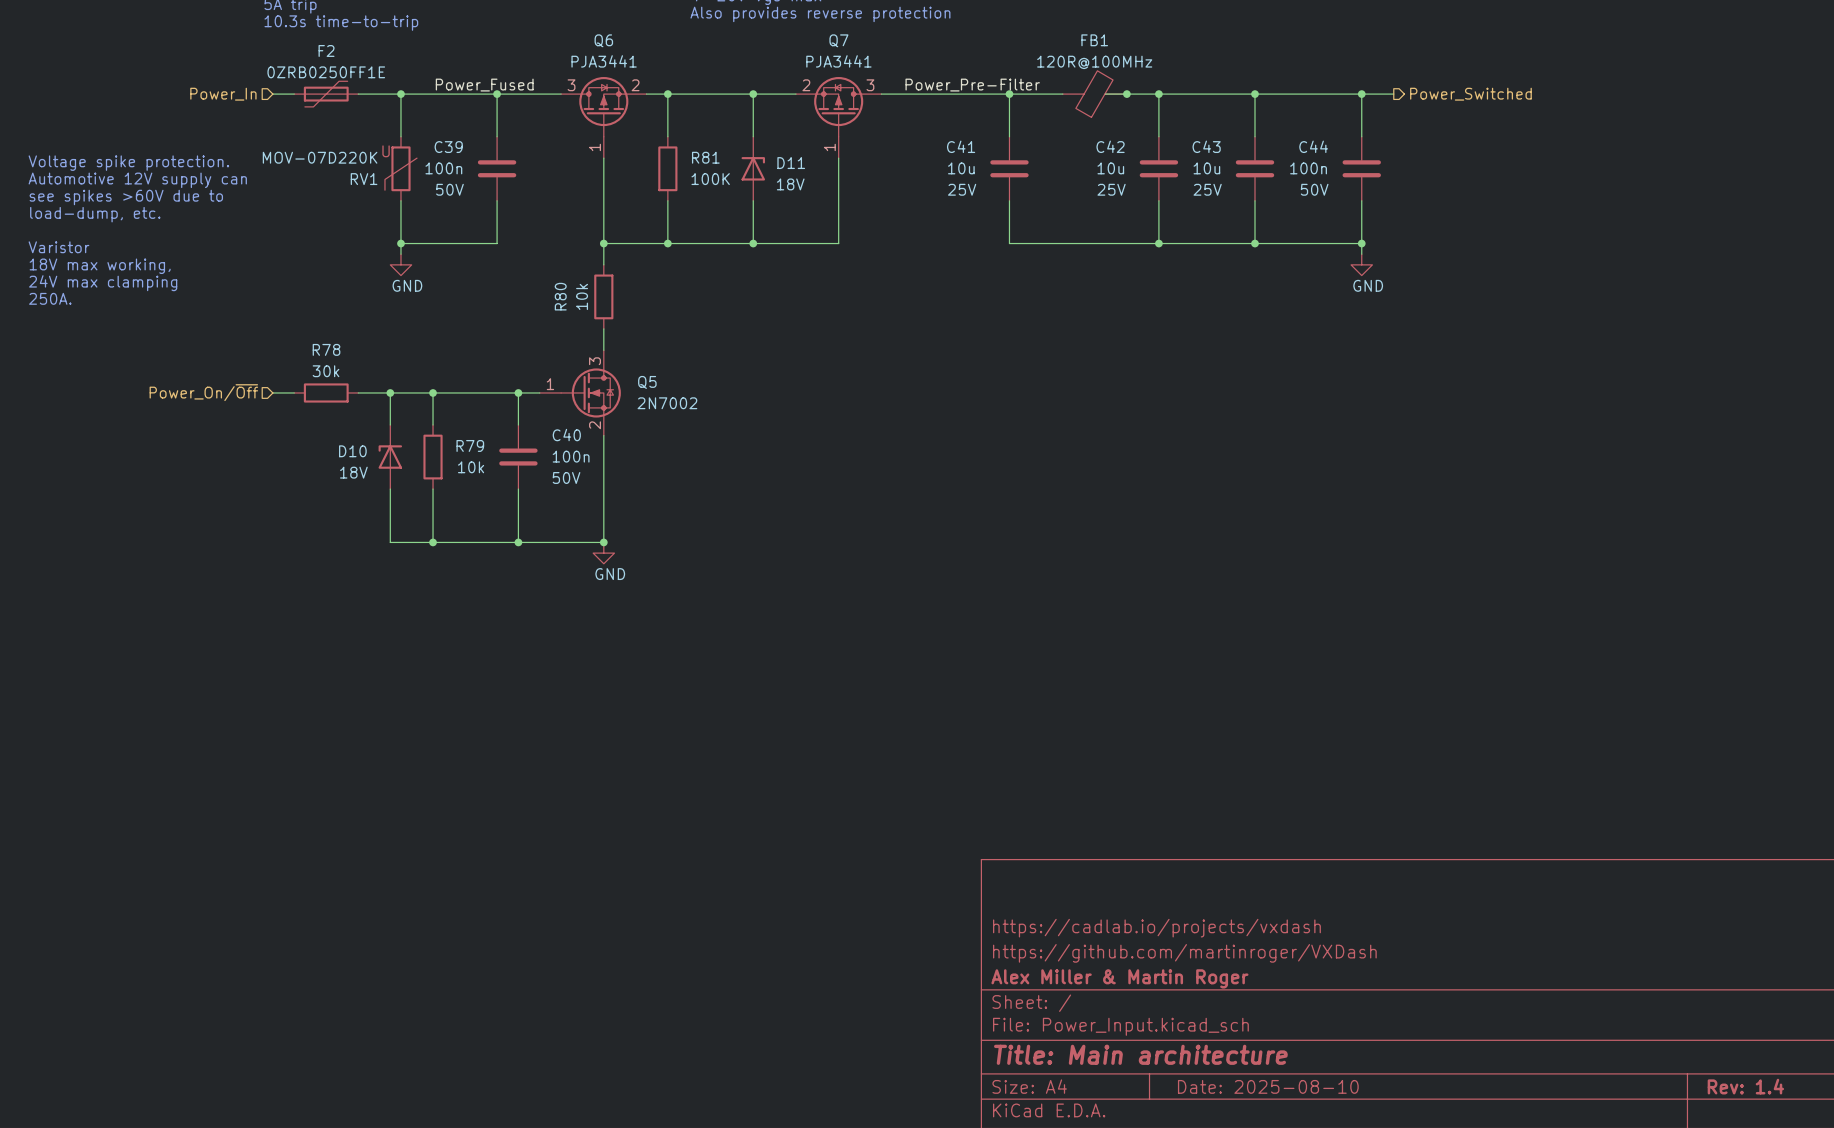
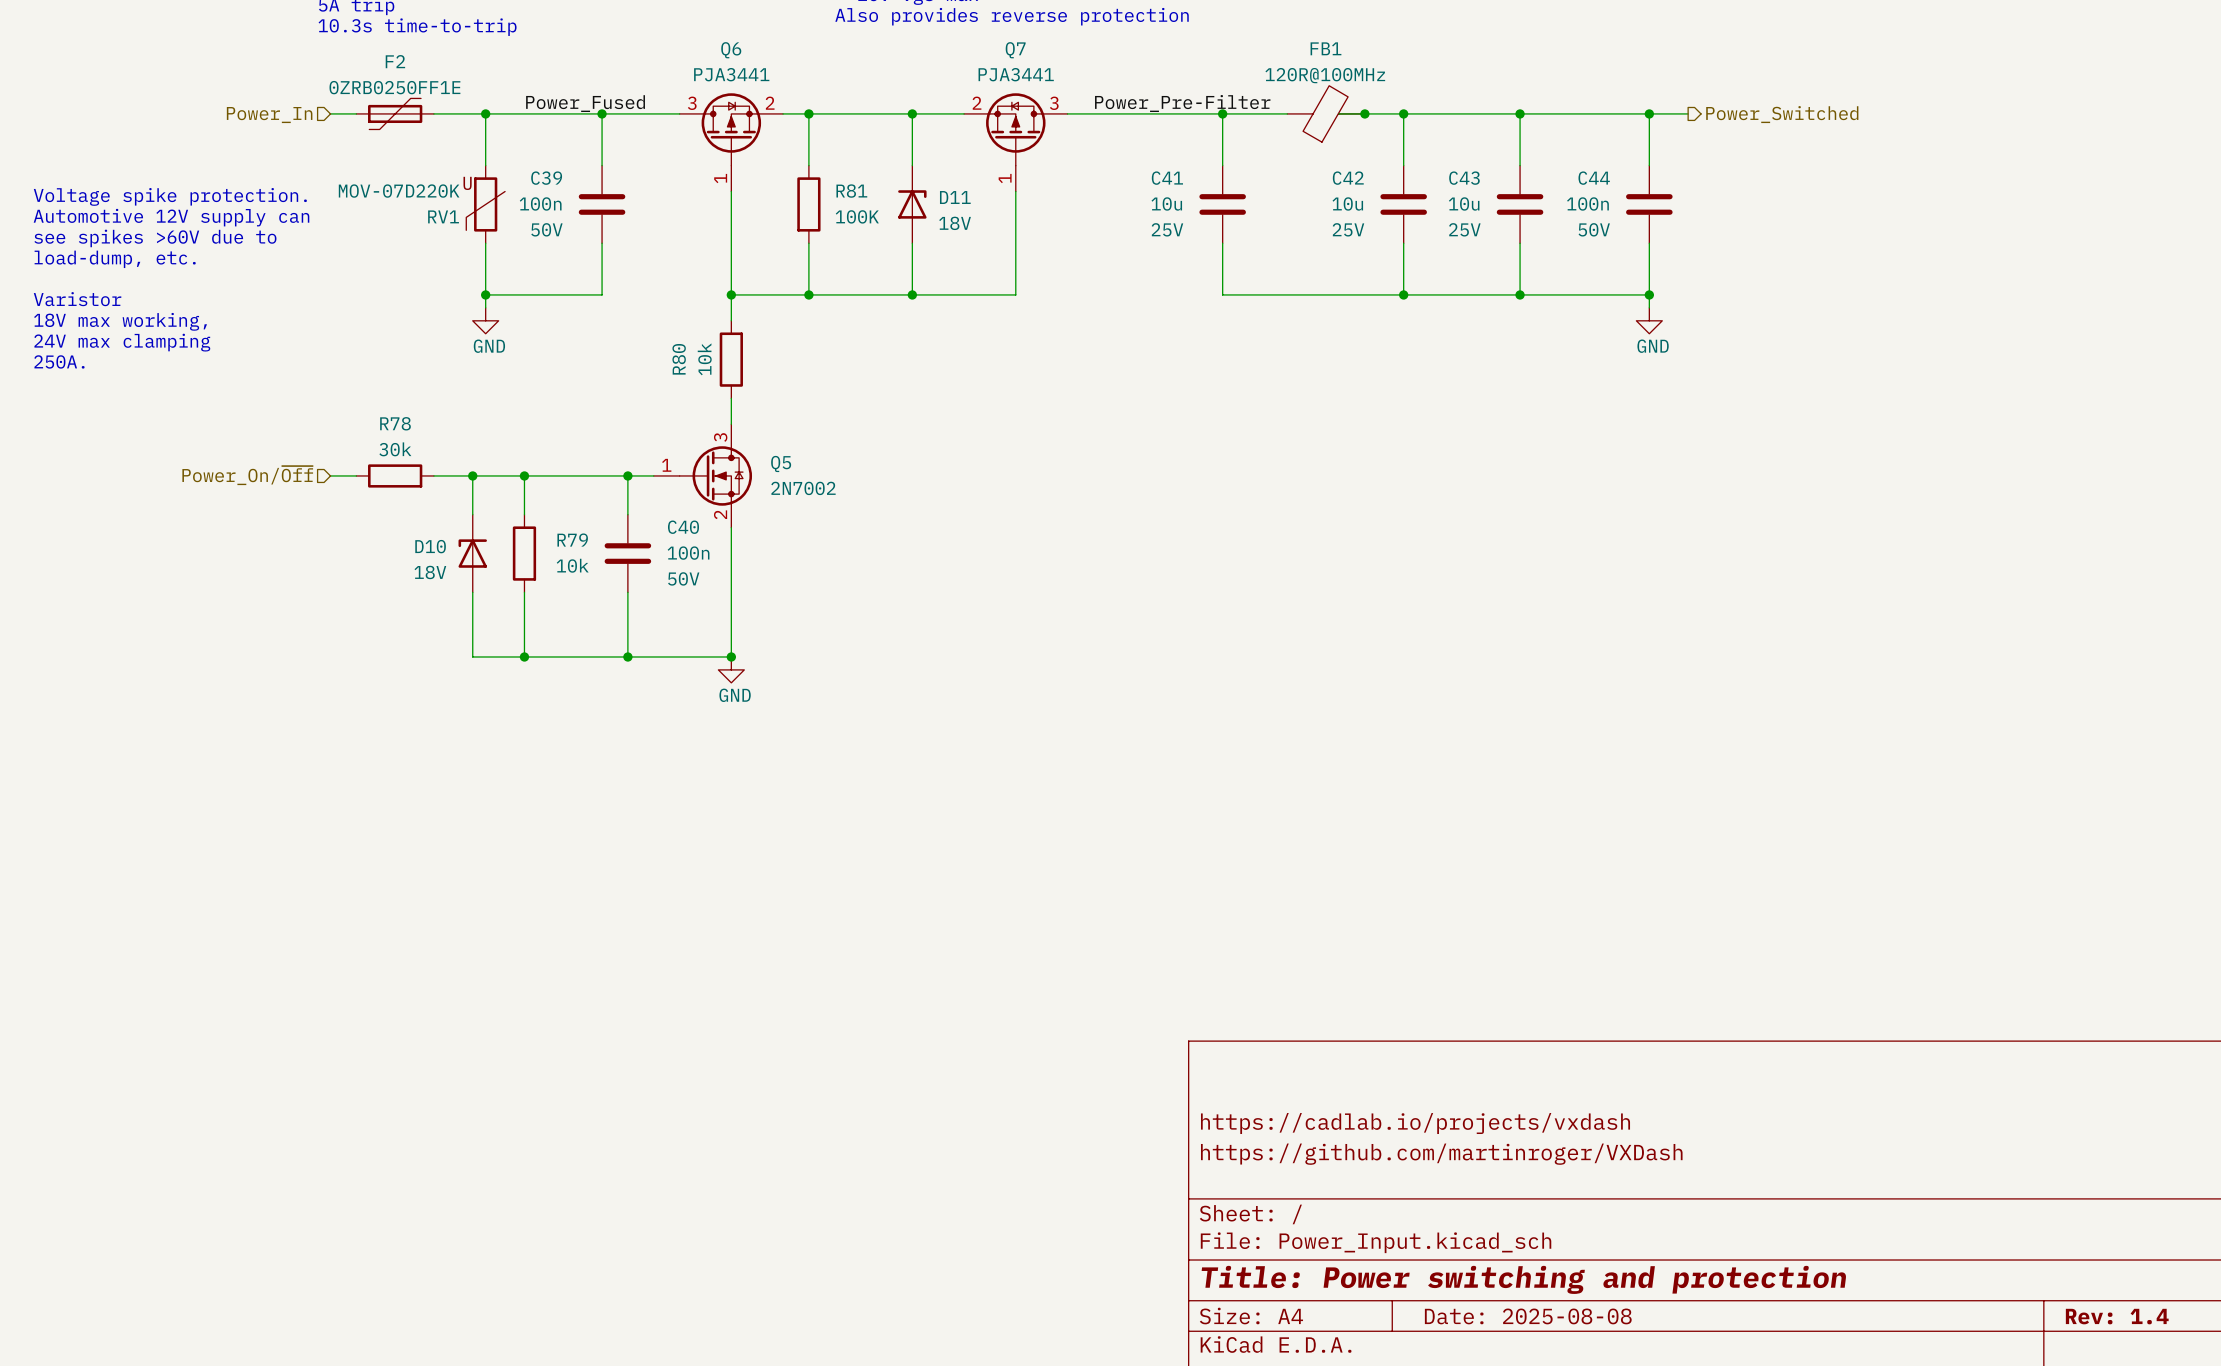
title block: Alex Miller & Martin Roger (1119, 978) -> none
title block: Title: Main architecture (1140, 1054) -> Title: Power switching and protection (1523, 1279)
title block: Date: 2025-08-10 (1268, 1086) -> Date: 2025-08-08 (1528, 1316)

